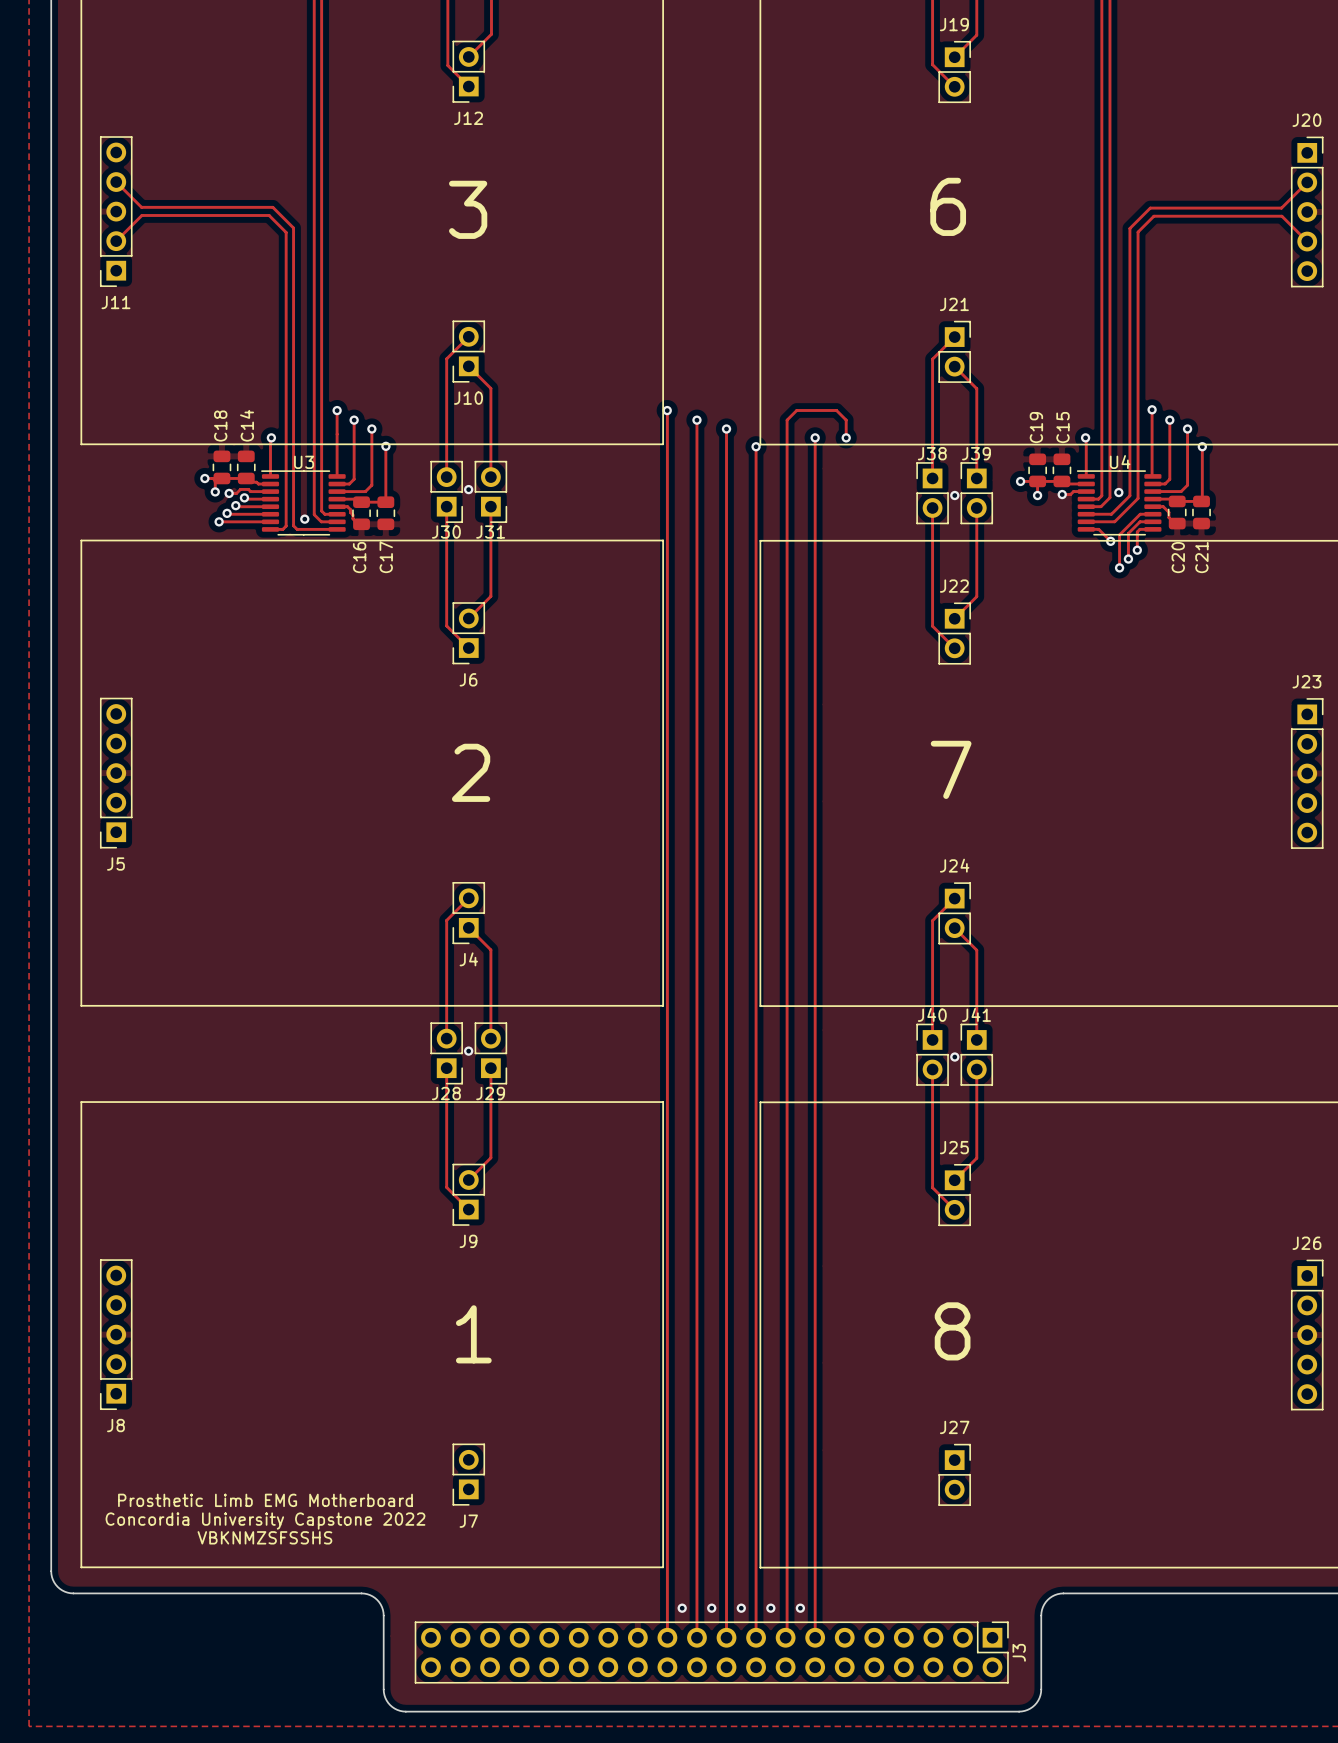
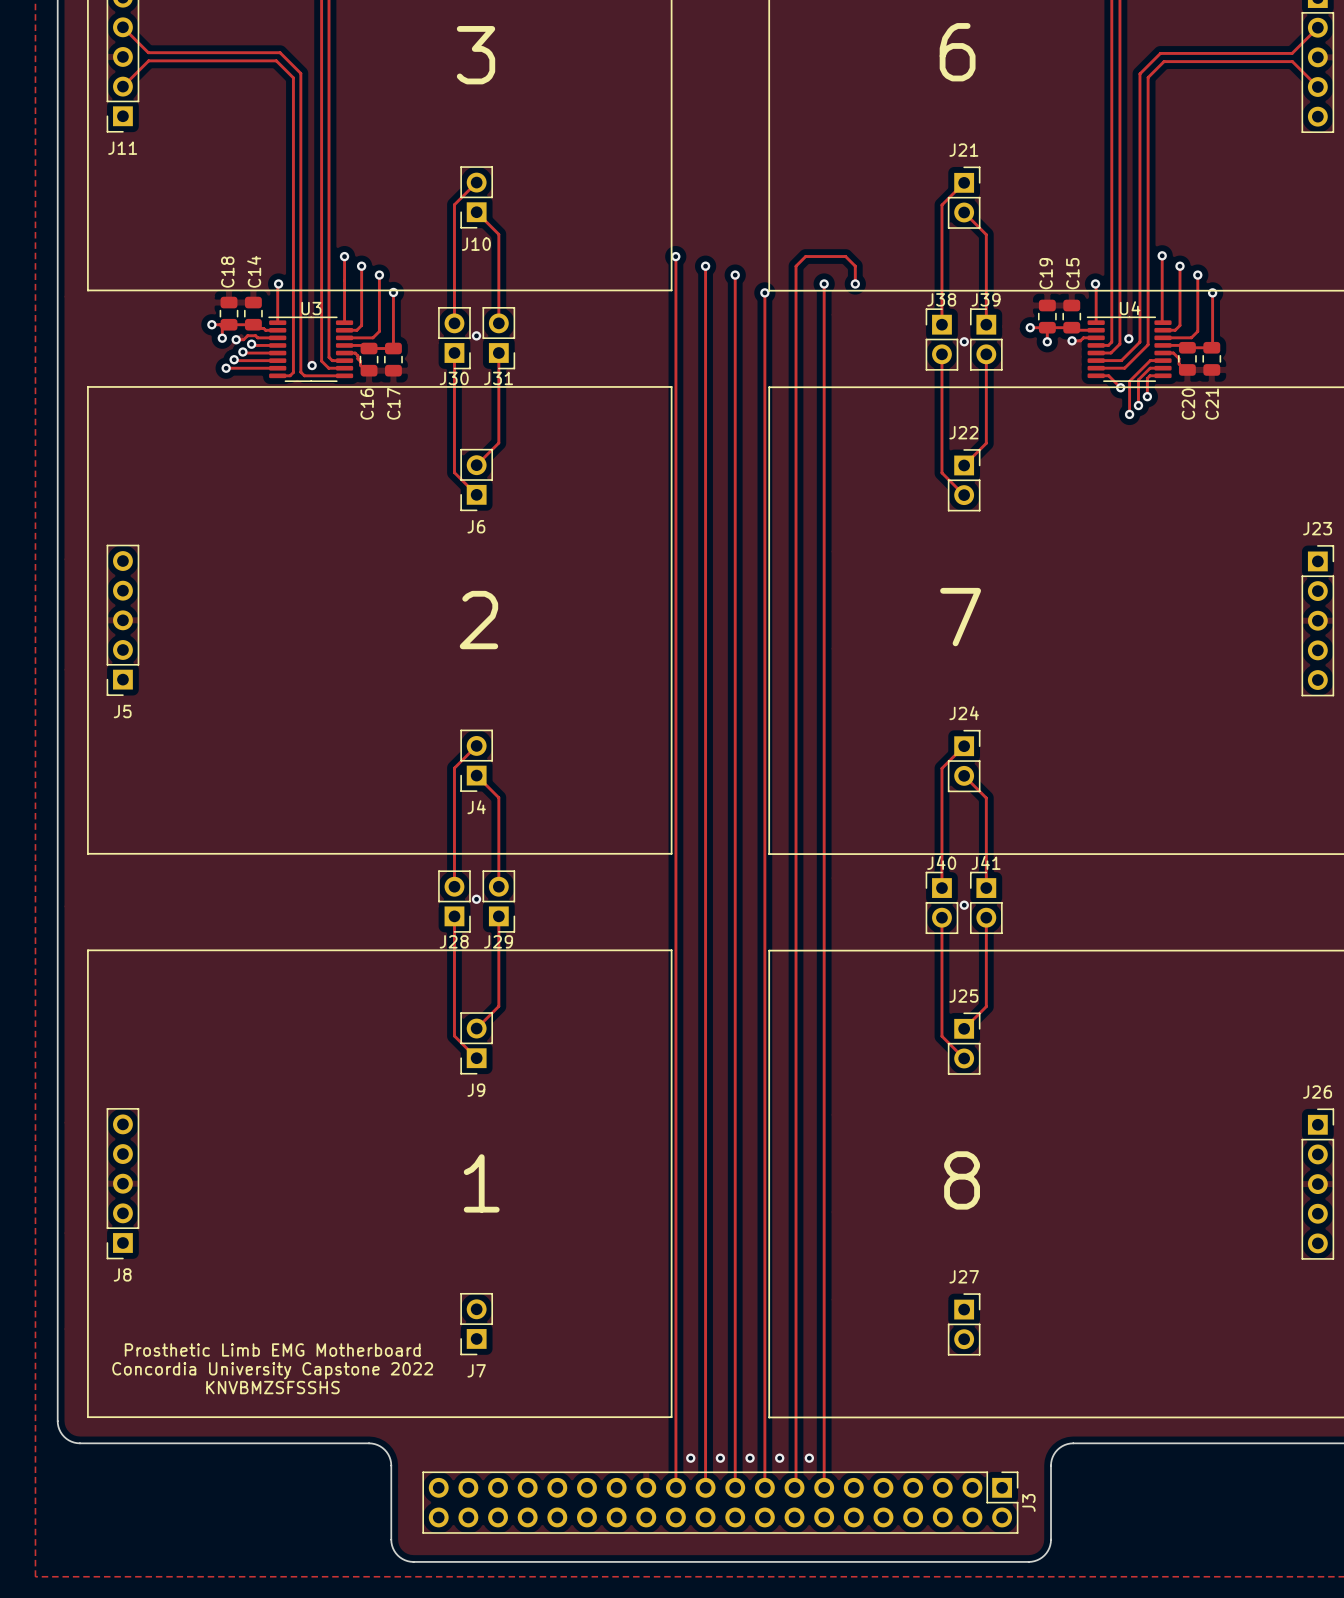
text: VBKNMZSFSSHS (264, 1537) -> KNVBMZSFSSHS (272, 1387)

